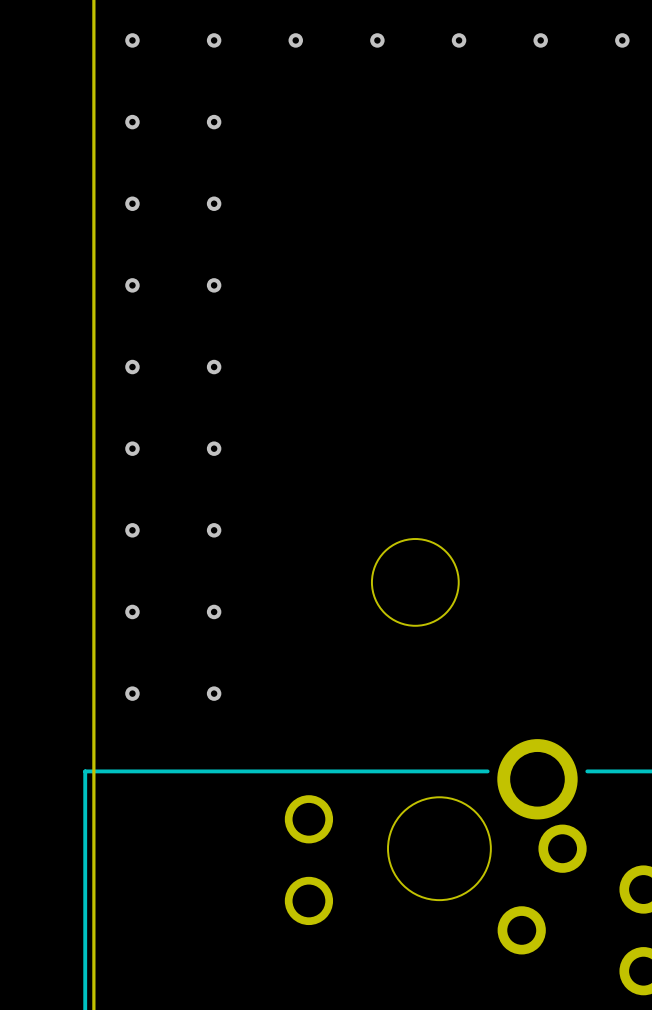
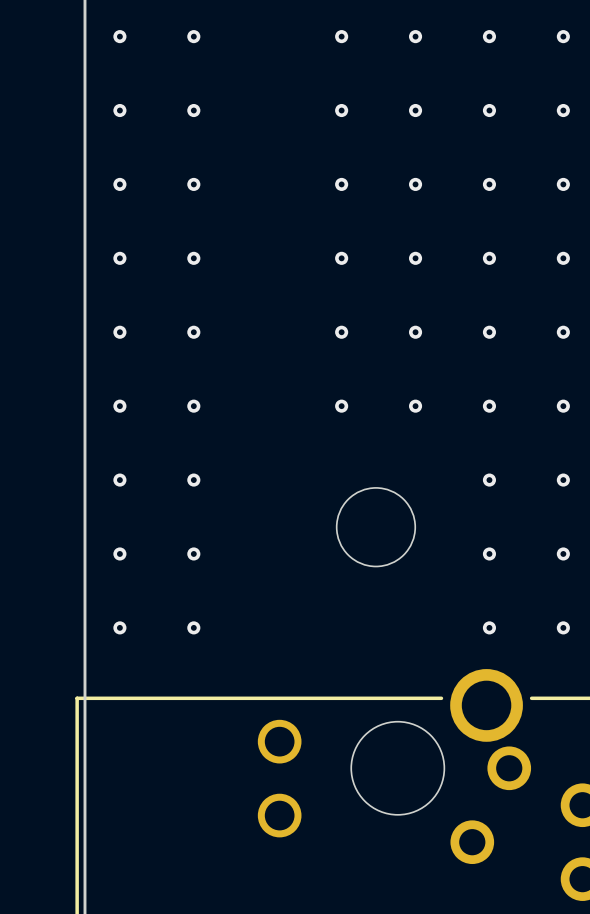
via: (295, 40) -> none
via: none -> (341, 110)
via: none -> (415, 110)
via: none -> (489, 110)
via: none -> (563, 110)
via: none -> (341, 184)
via: none -> (415, 184)
via: none -> (489, 184)
via: none -> (563, 184)
via: none -> (341, 258)
via: none -> (415, 258)
via: none -> (489, 258)
via: none -> (563, 258)
via: none -> (341, 332)
via: none -> (415, 332)
via: none -> (489, 332)
via: none -> (563, 332)
via: none -> (341, 406)
via: none -> (415, 406)
via: none -> (489, 406)
via: none -> (563, 406)
via: none -> (489, 480)
via: none -> (563, 480)
via: none -> (489, 553)
via: none -> (563, 553)
via: none -> (489, 627)
via: none -> (563, 627)

